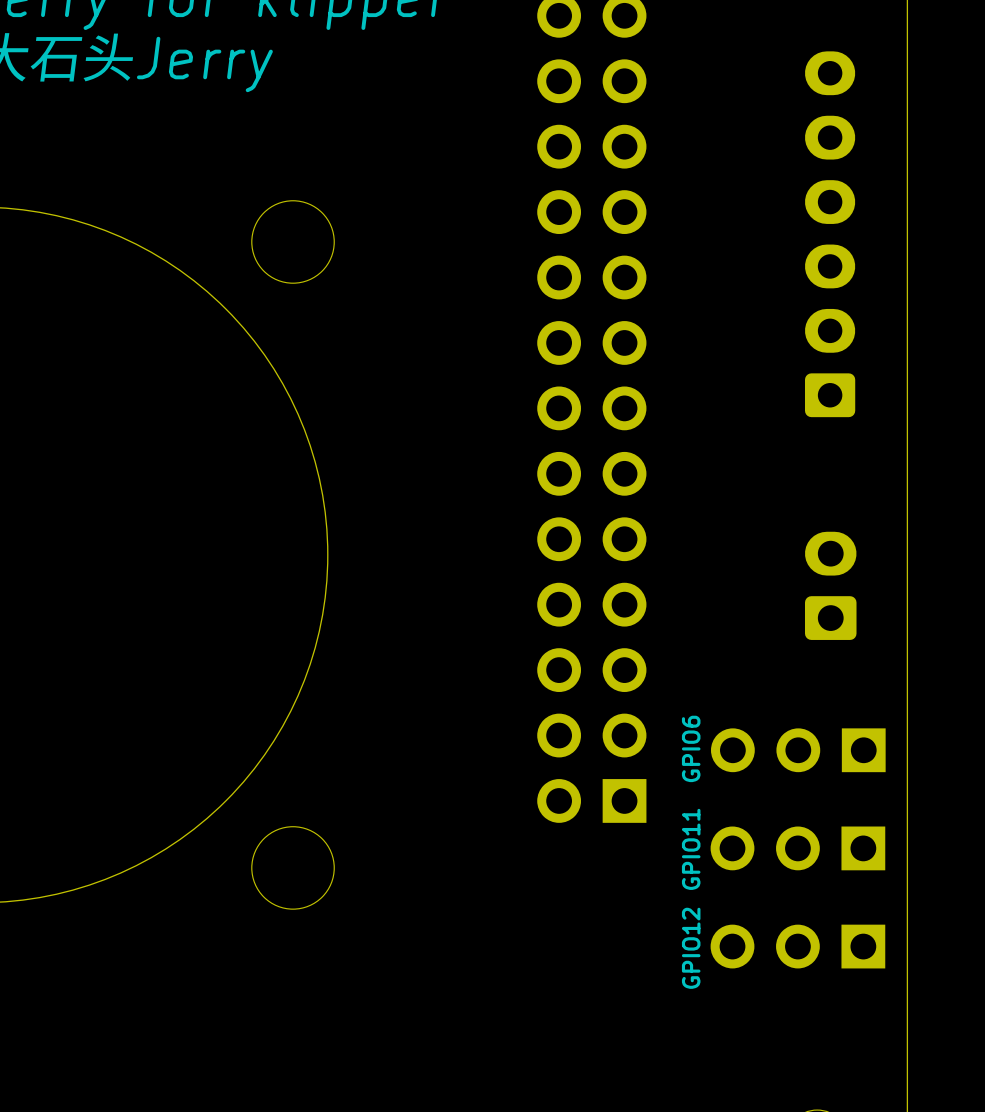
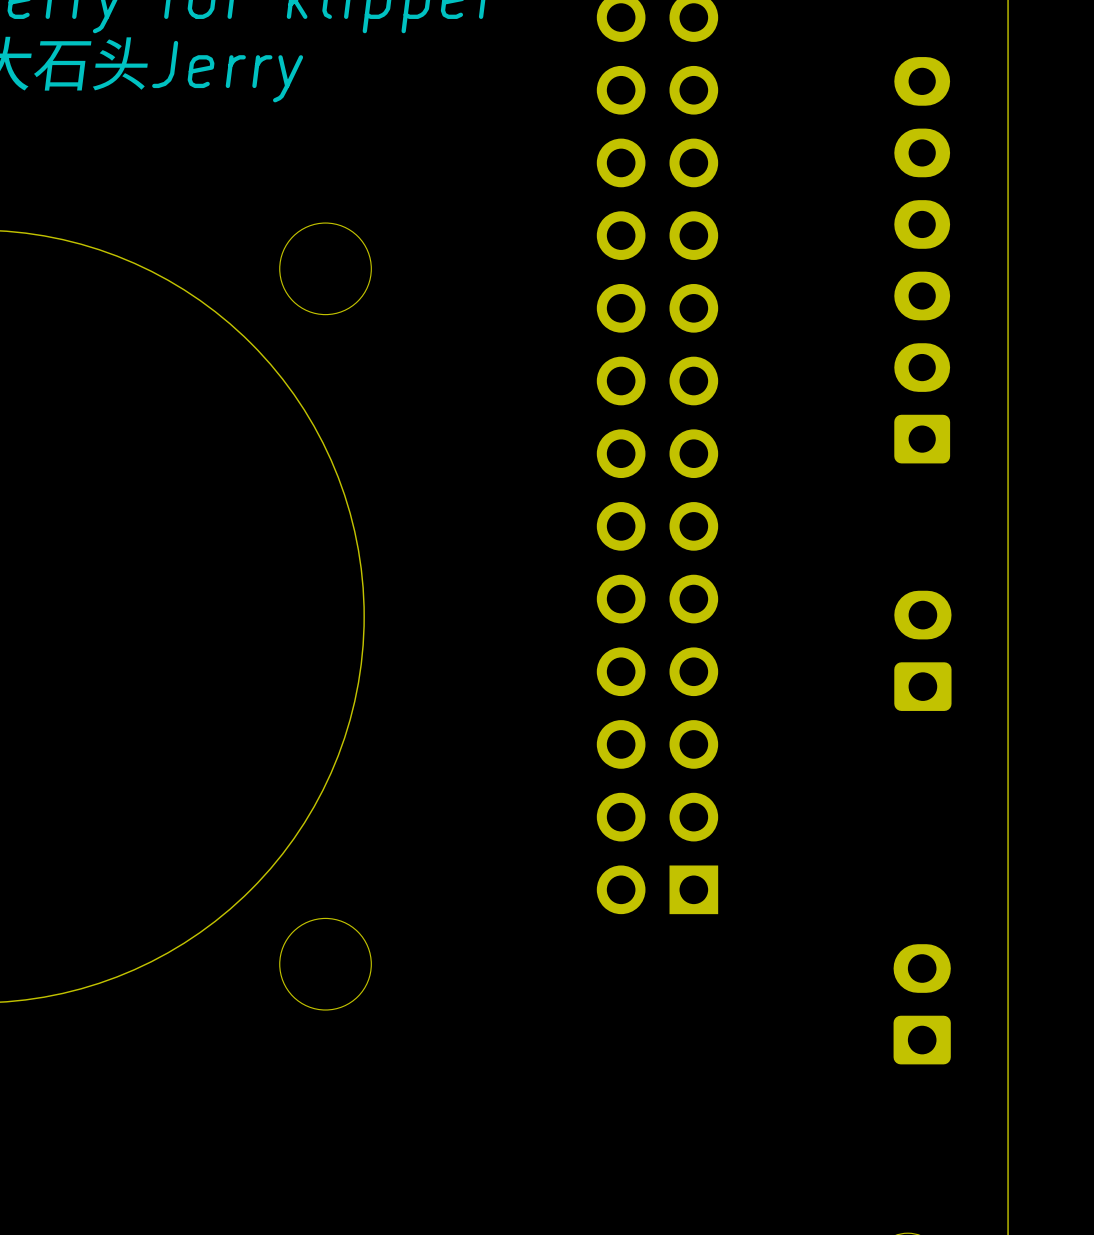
text: GPIO6 (691, 748) -> none
part: (798, 750) -> none
part: (797, 848) -> none
text: GPIO11 (691, 849) -> none
part: none -> (922, 1004)
part: (797, 946) -> none
text: GPIO12 (691, 948) -> none

